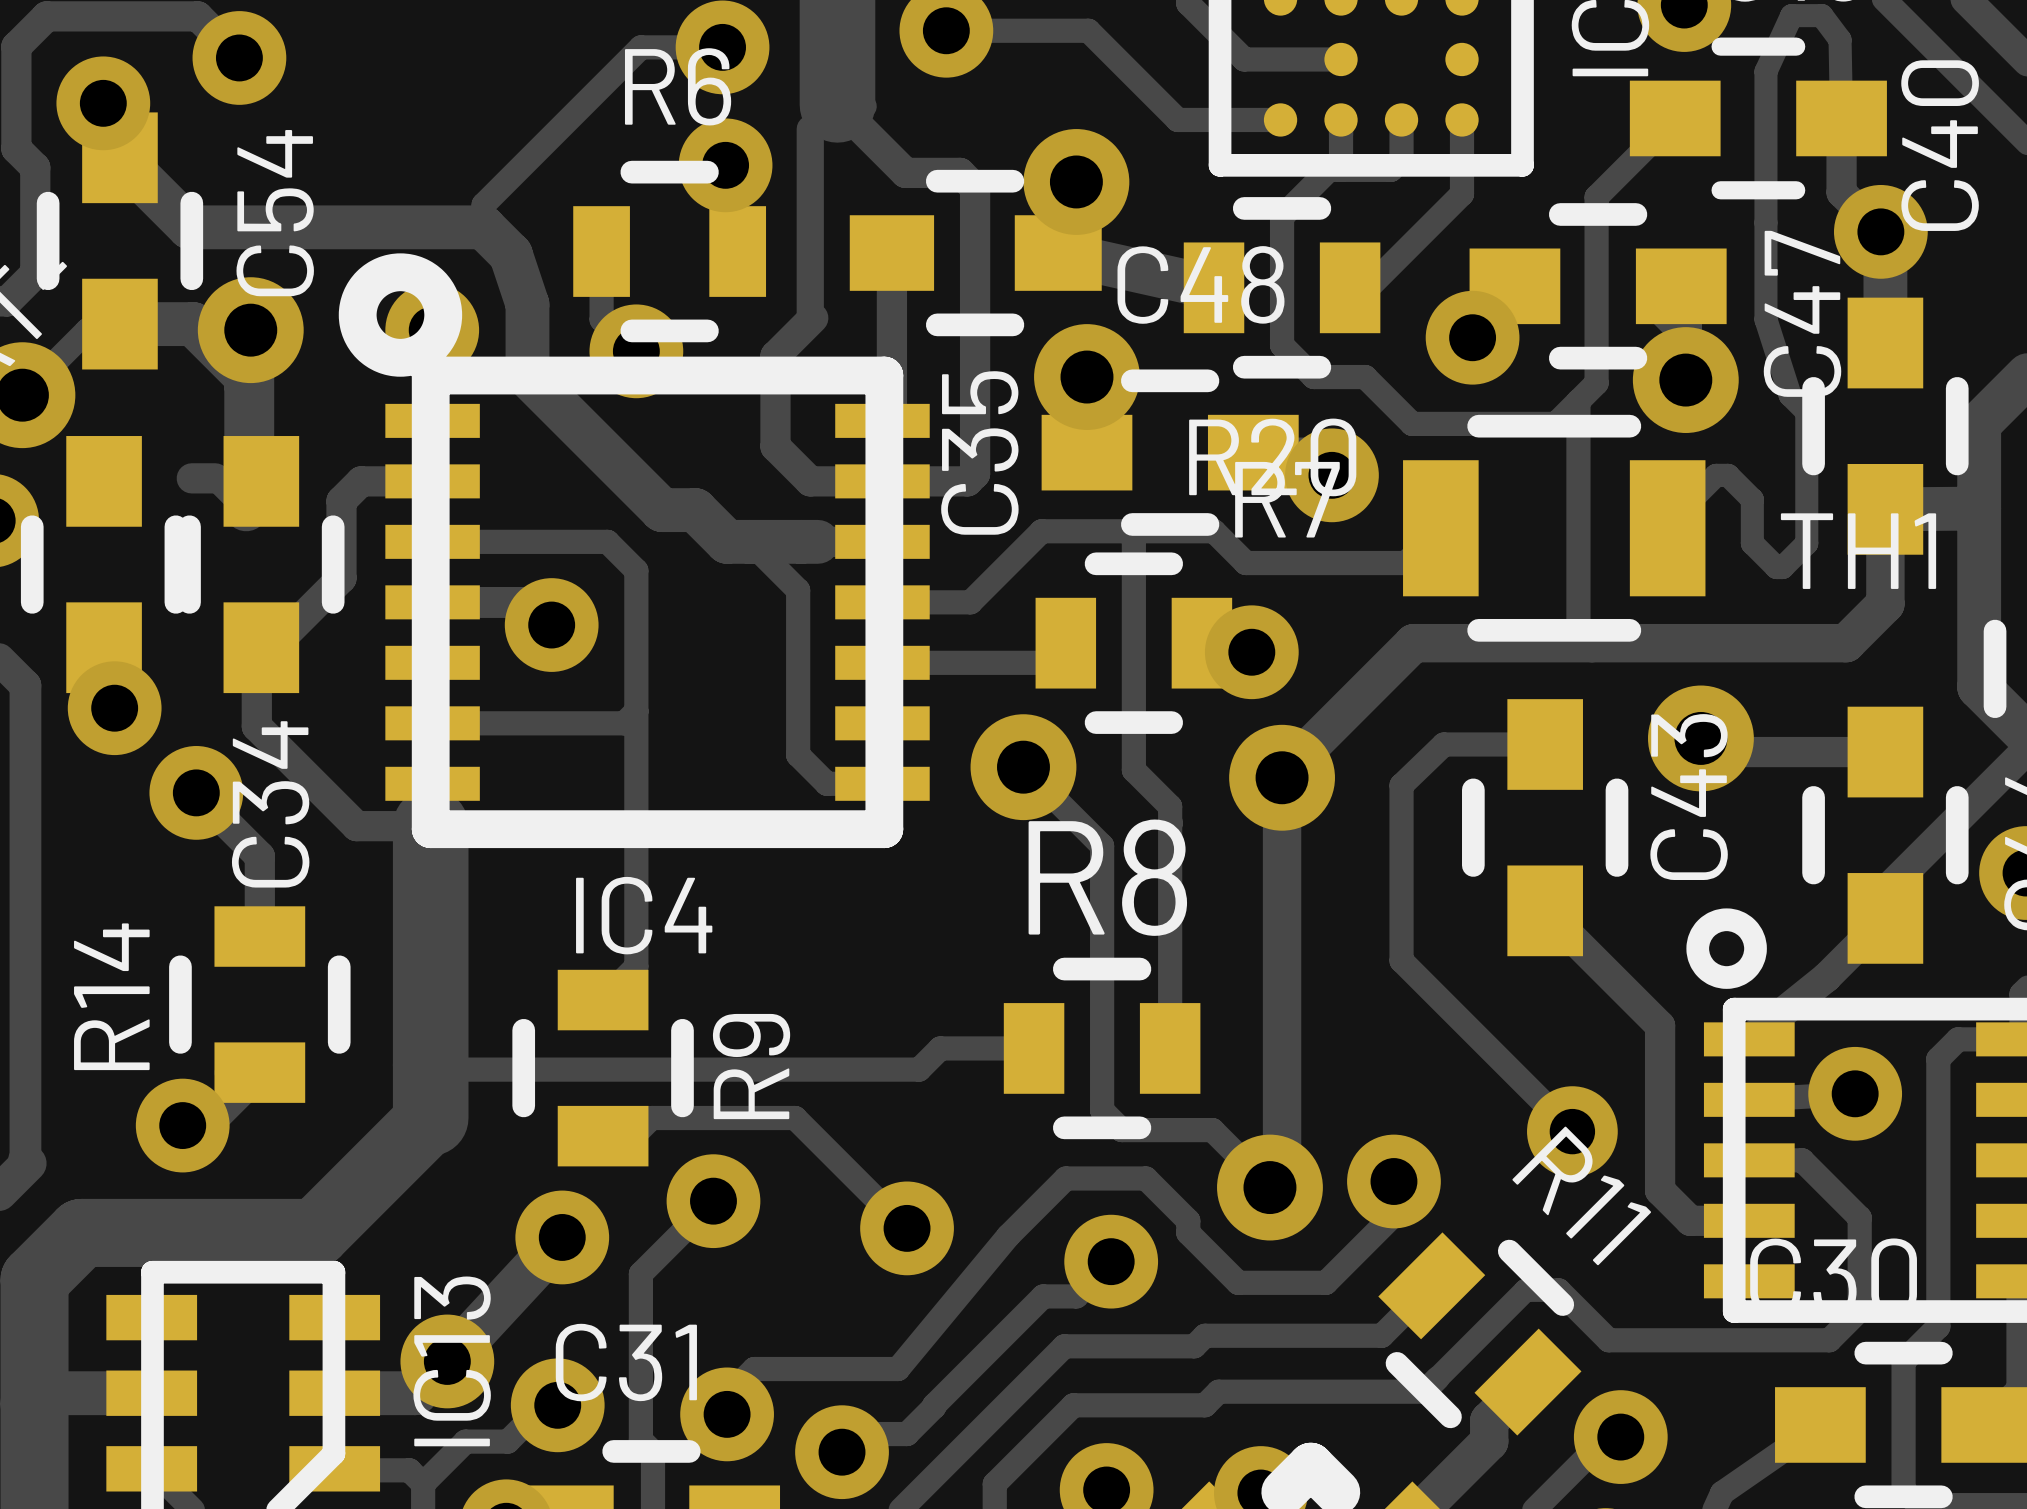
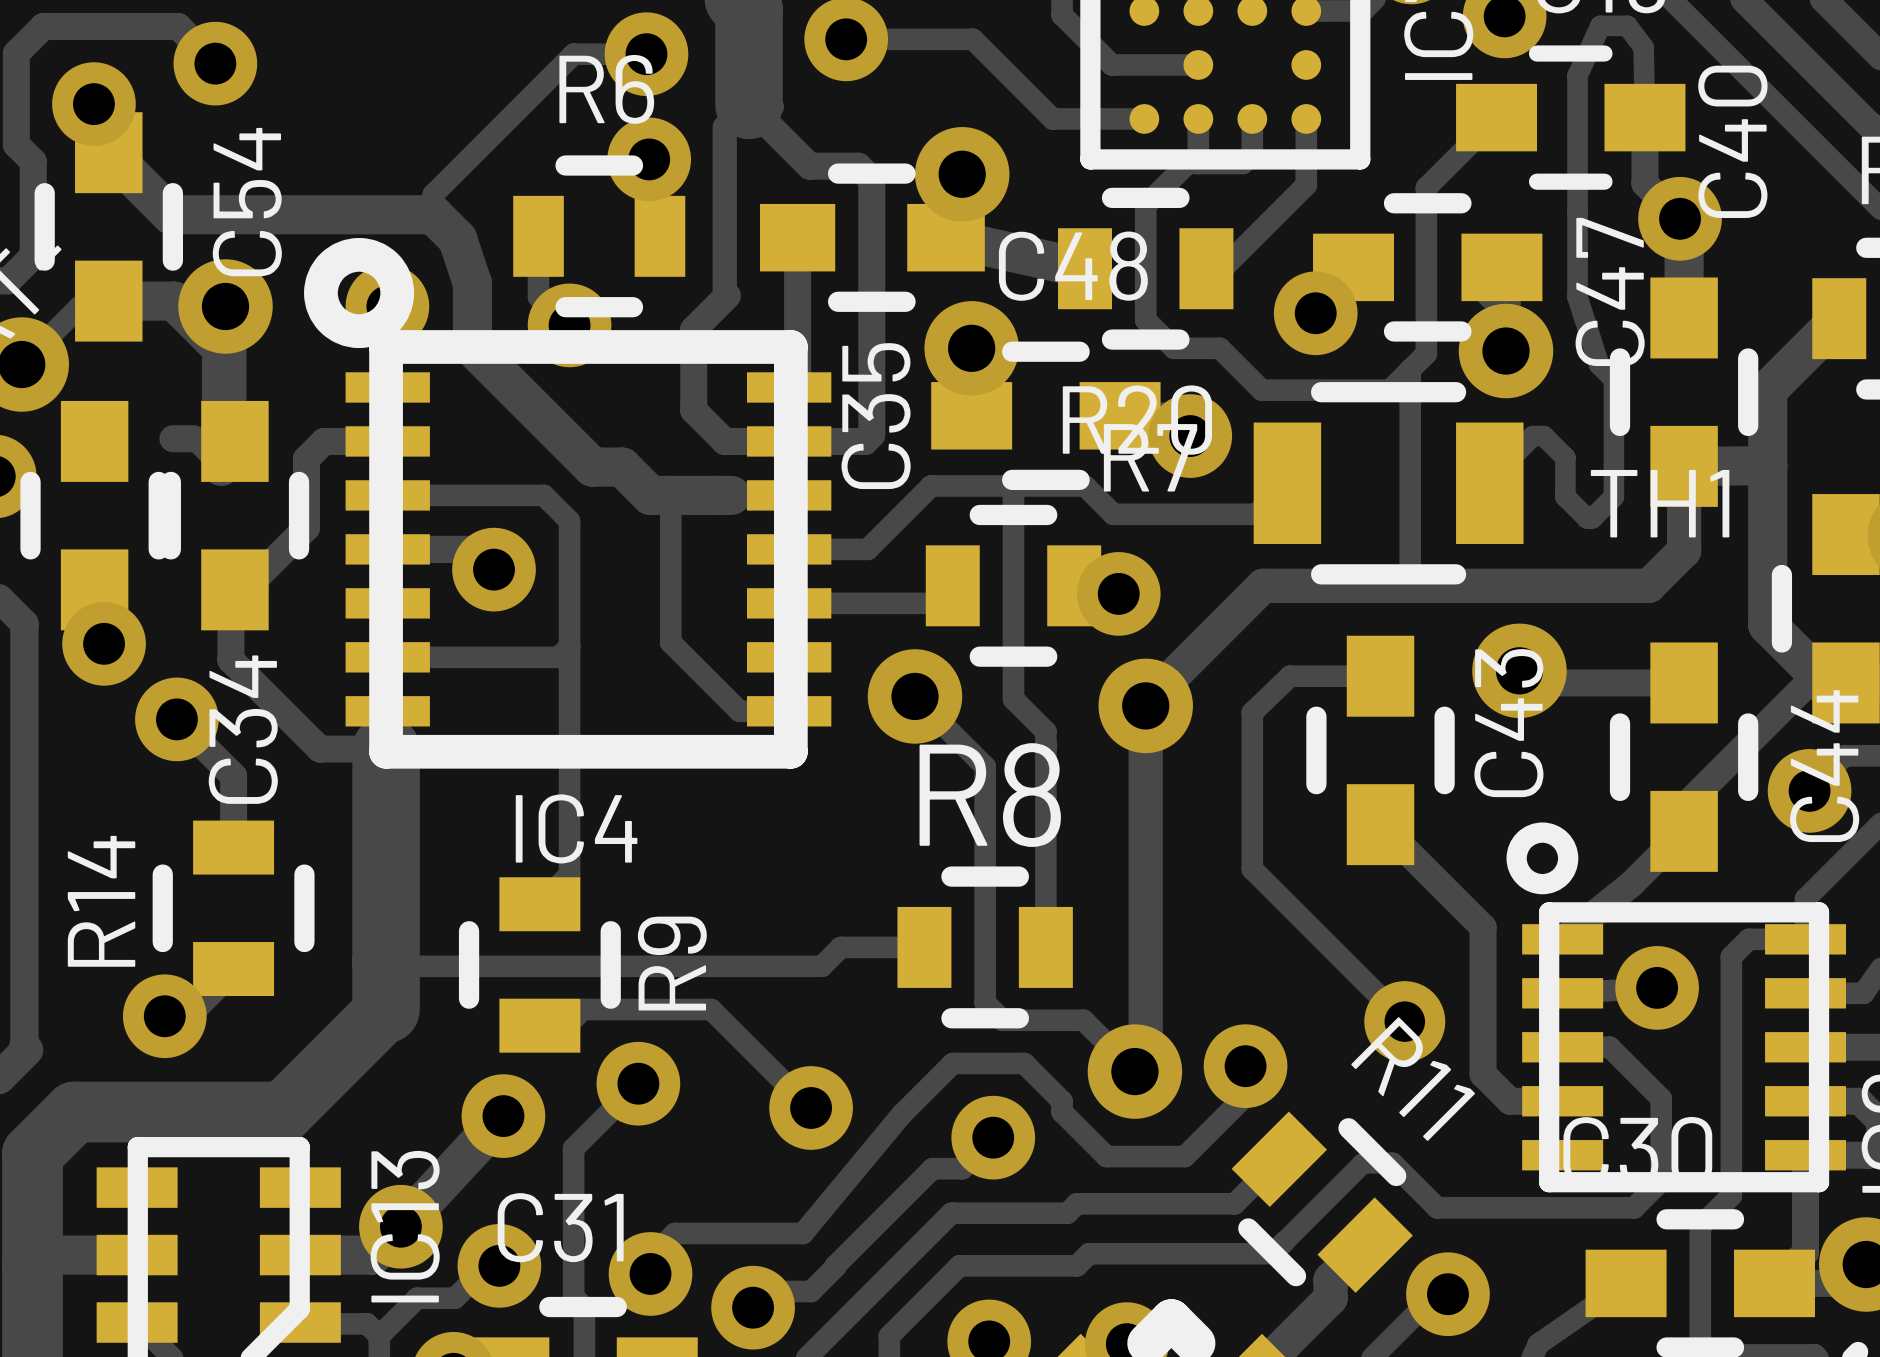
track: (749, 541) (798, 590) (798, 755) -> (670, 495) (670, 642) (713, 685)

